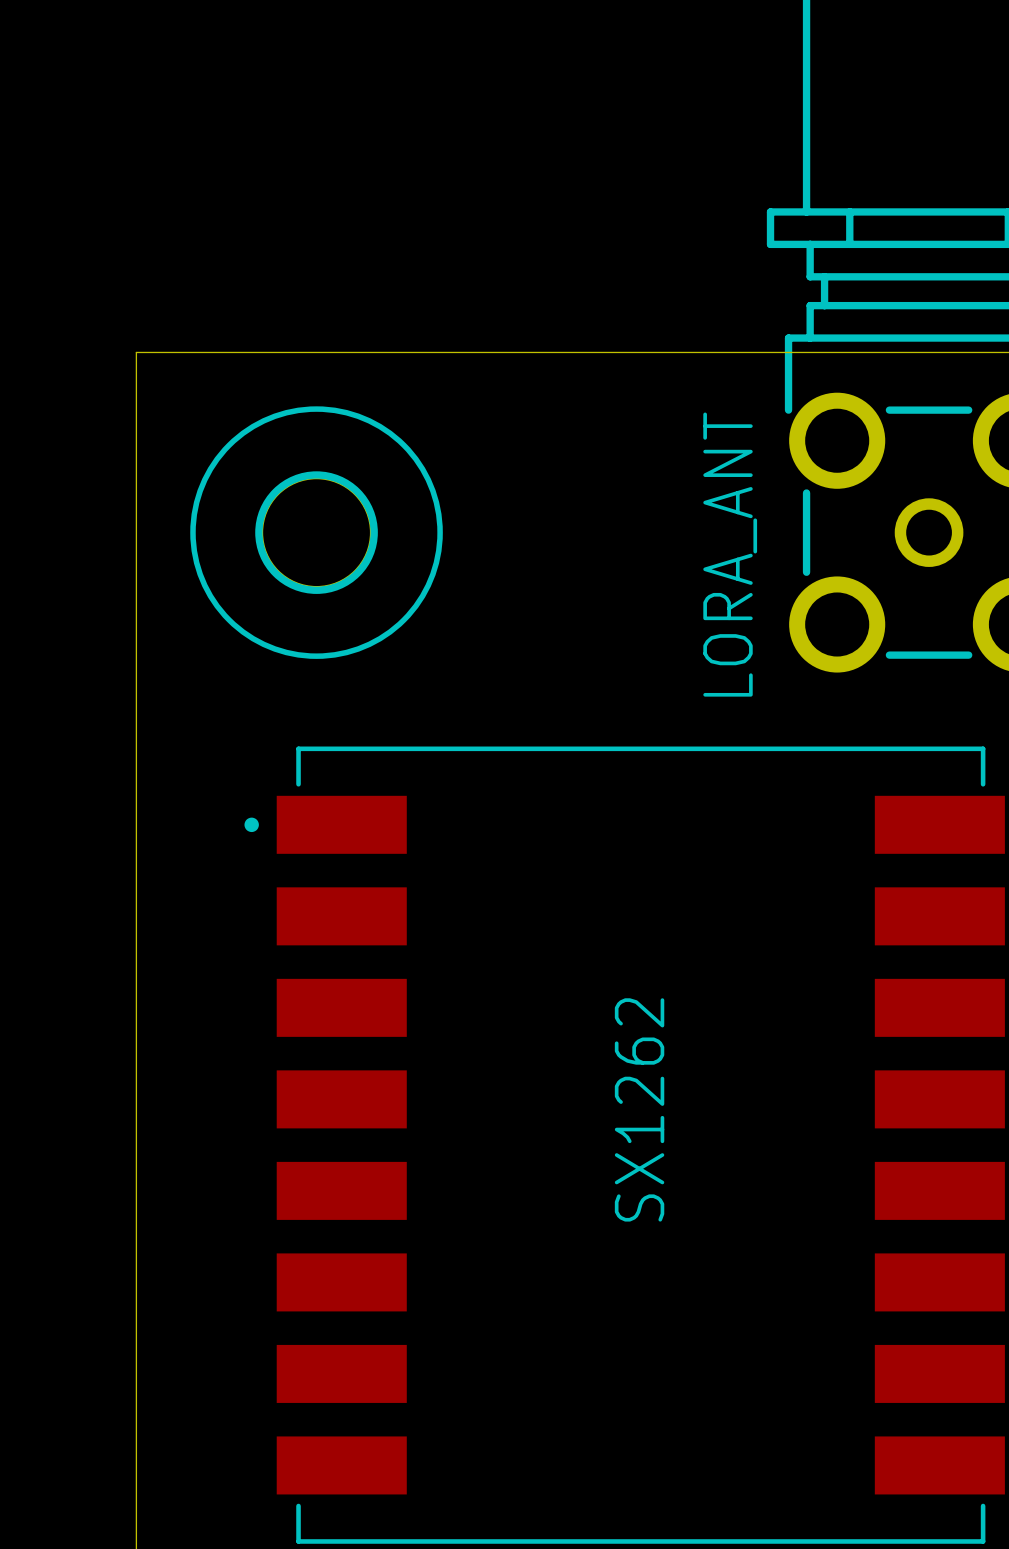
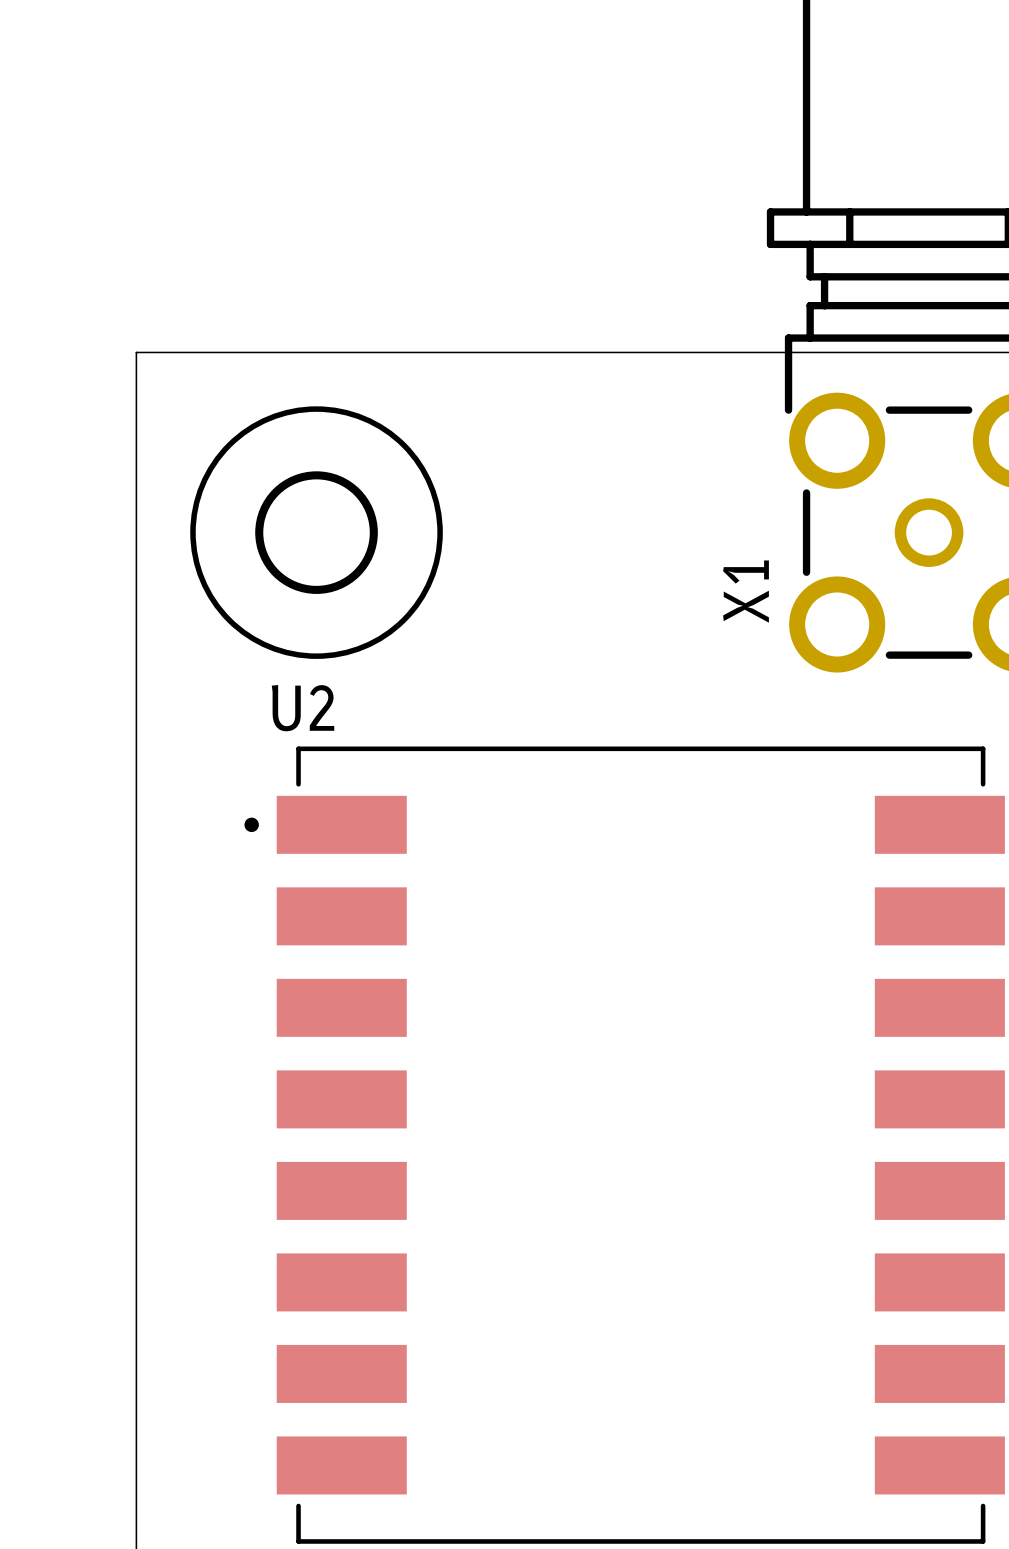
LORA_ANT name: LORA_ANT (730, 554) -> X1 (746, 591)
SX1262 name: SX1262 (639, 1109) -> U2 (303, 708)

